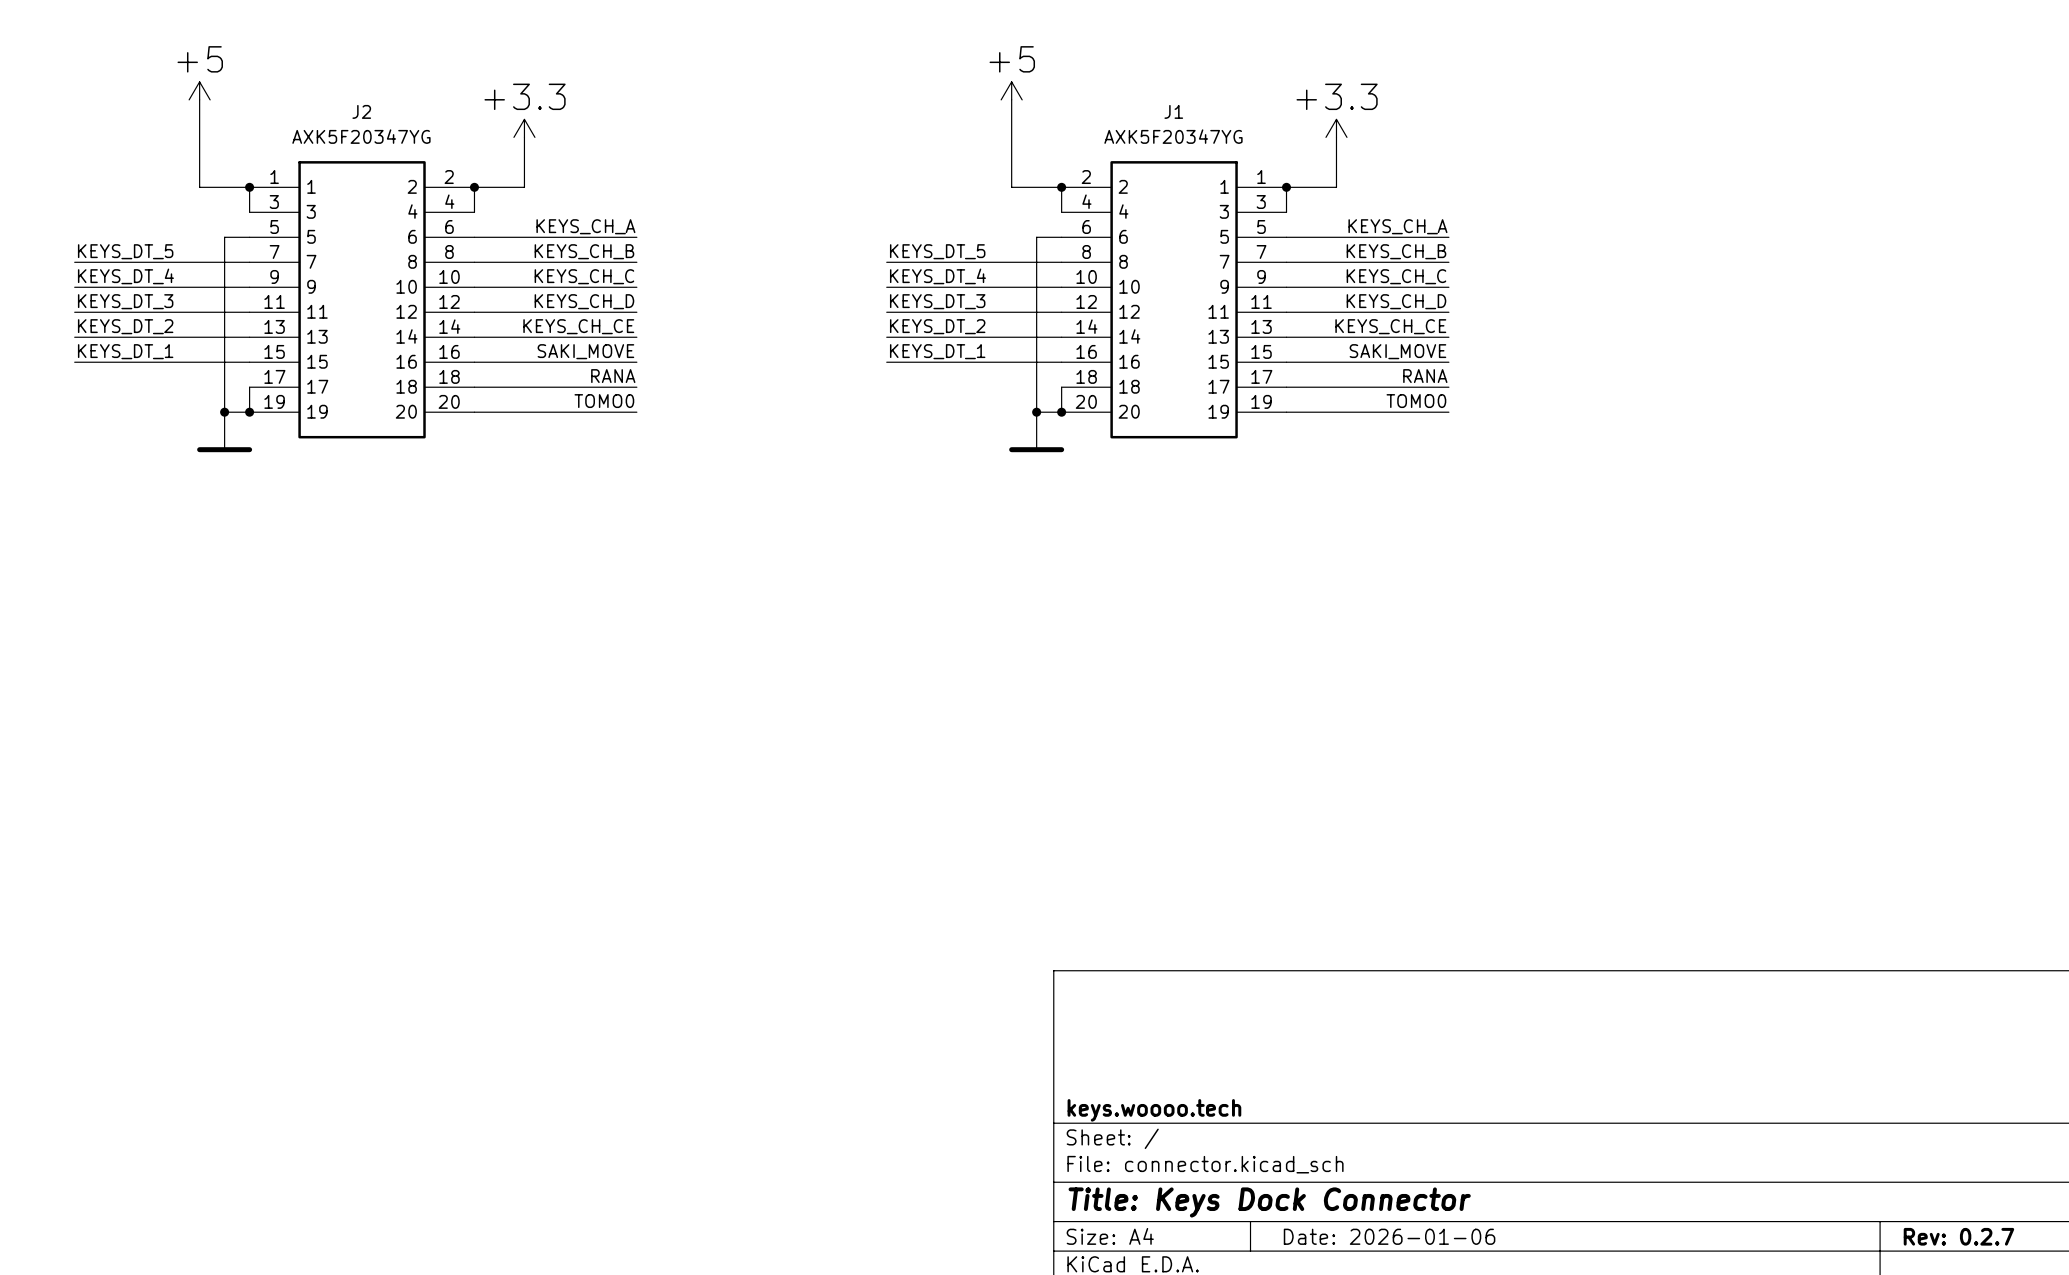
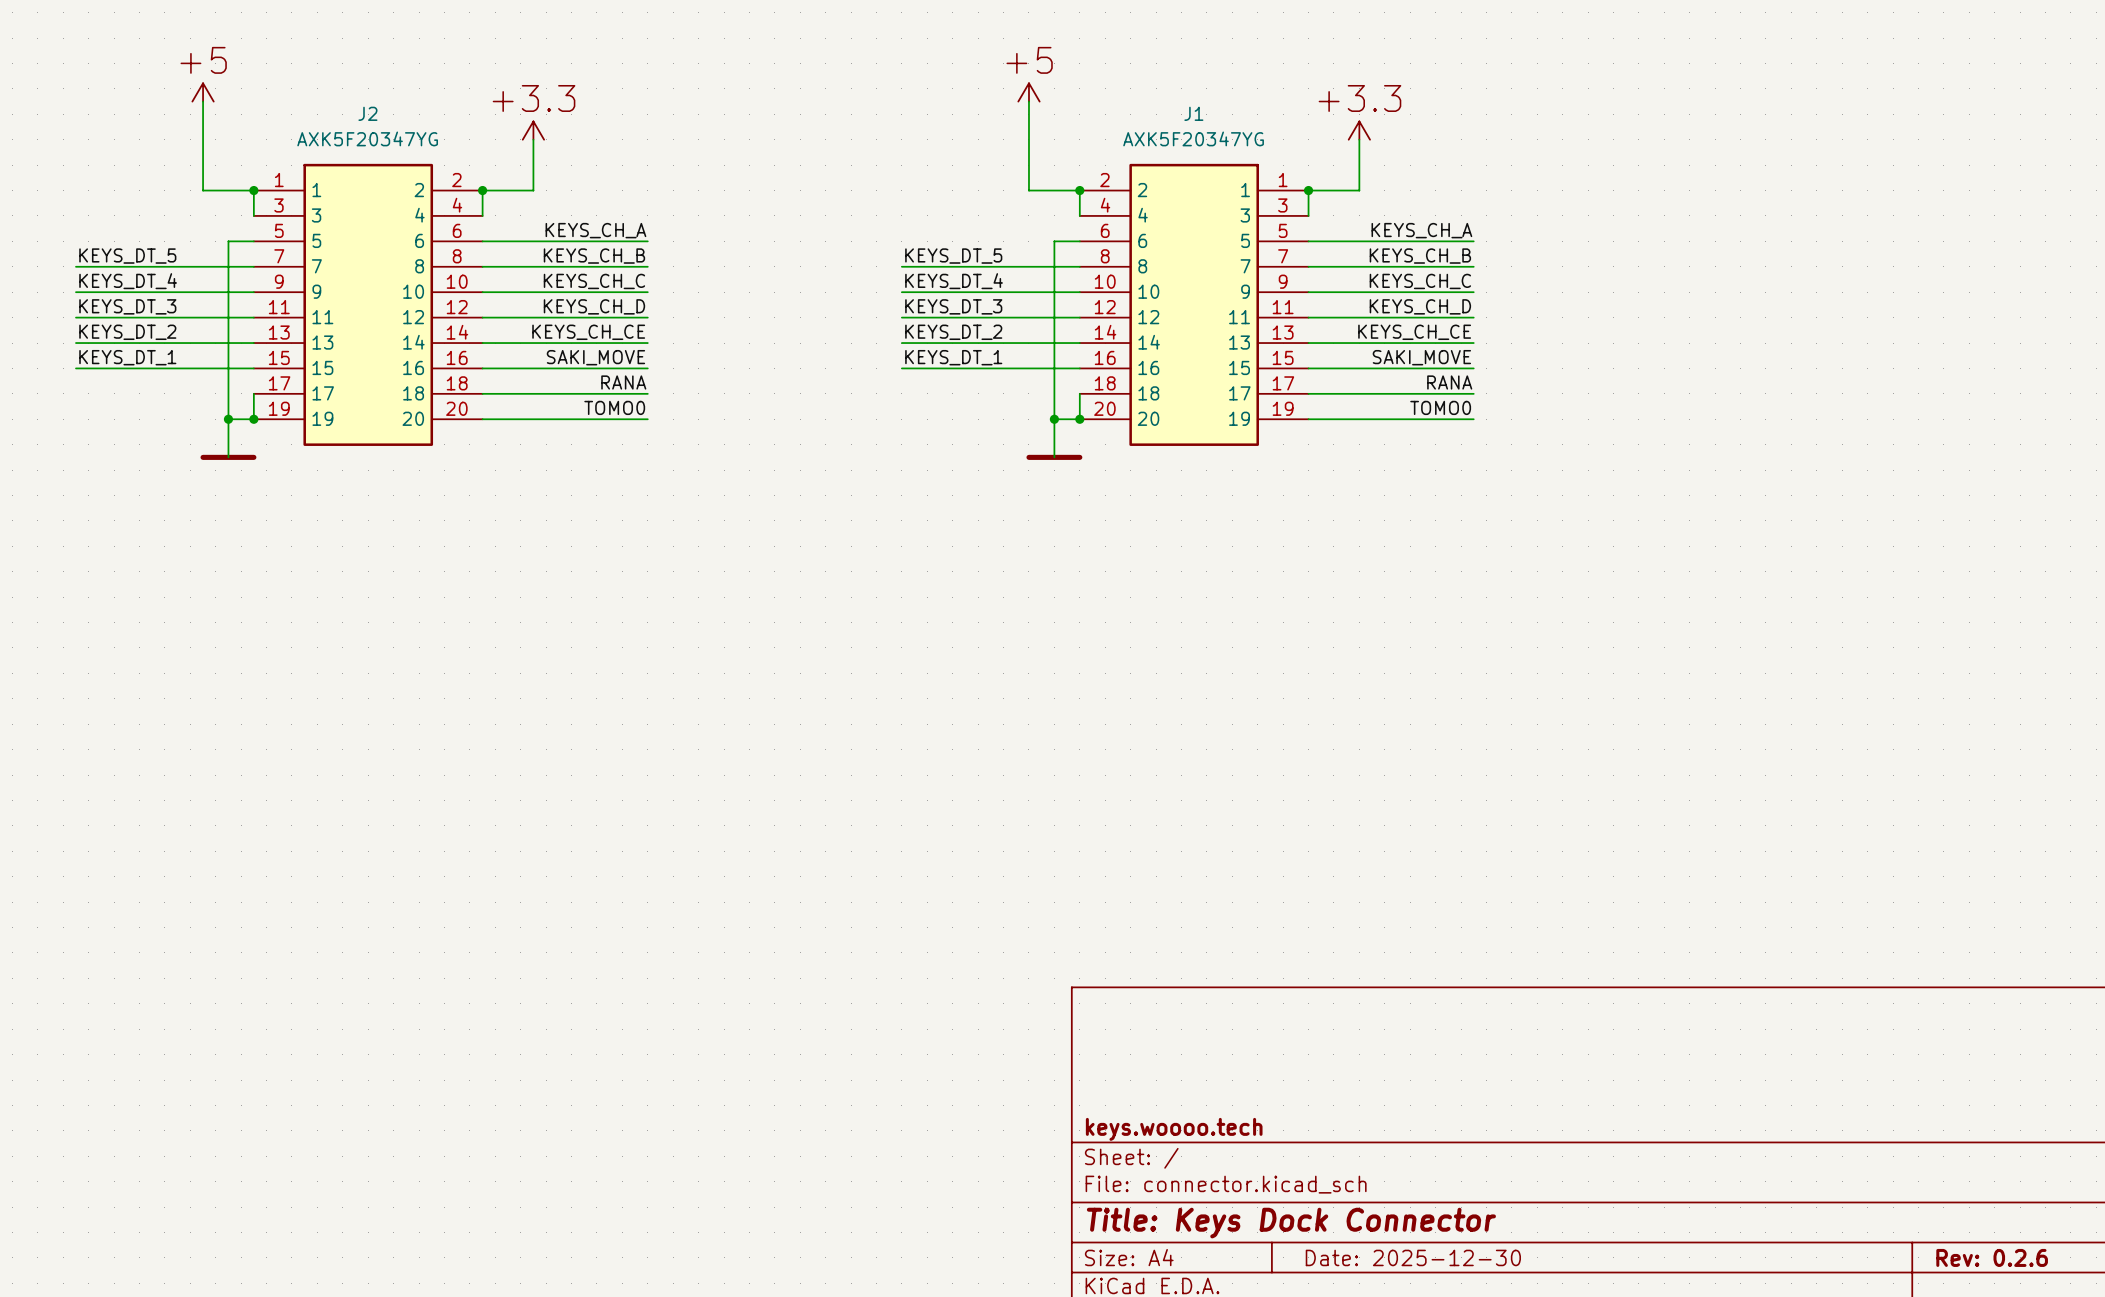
title block: Date: 2026-01-06 (1389, 1236) -> Date: 2025-12-30 (1413, 1257)
title block: Rev: 0.2.7 (1958, 1236) -> Rev: 0.2.6 (1992, 1257)

